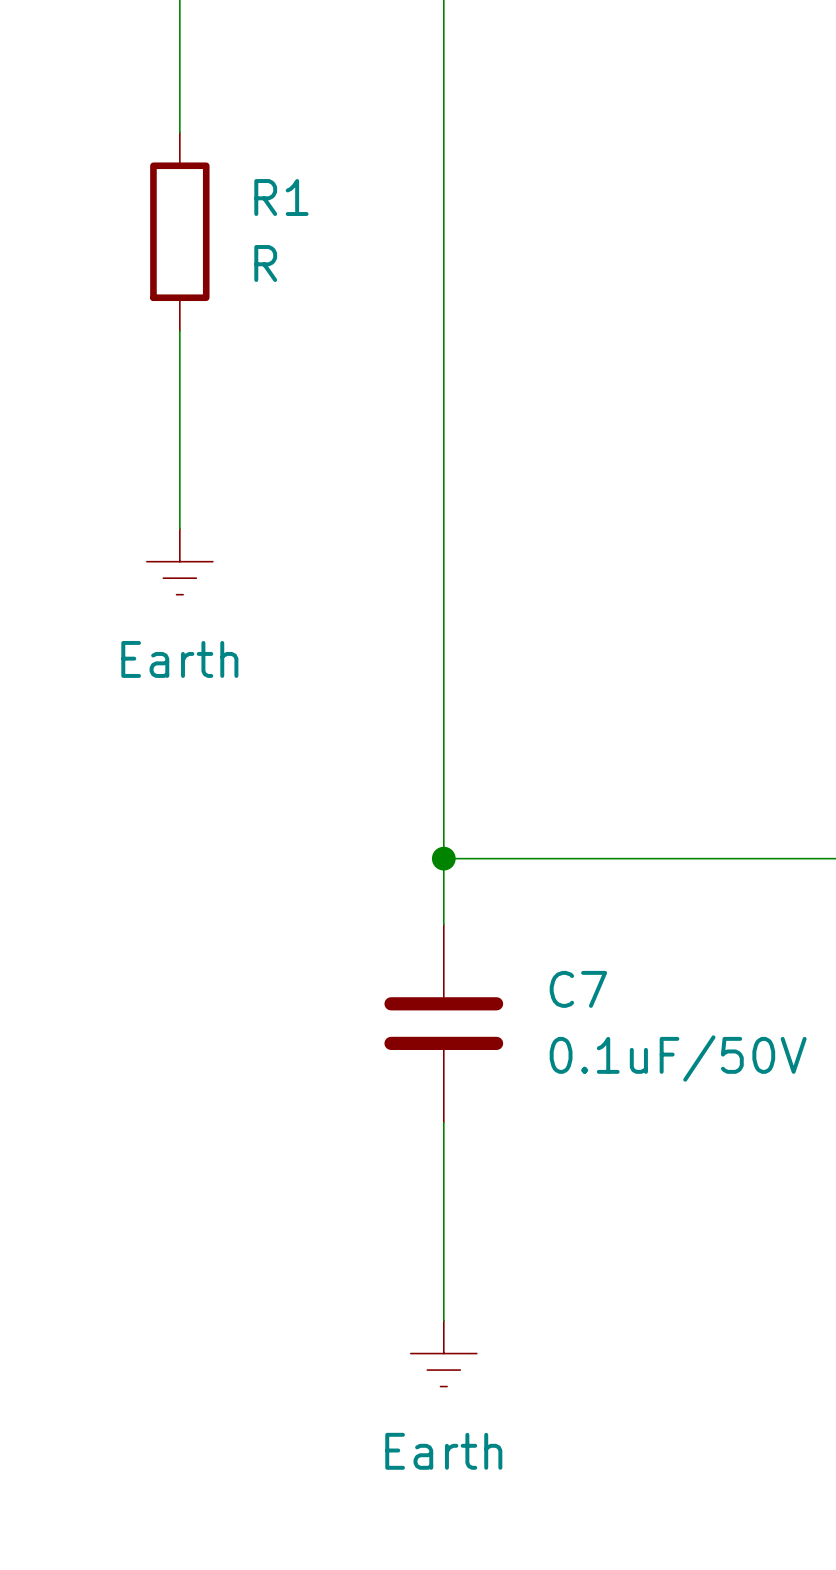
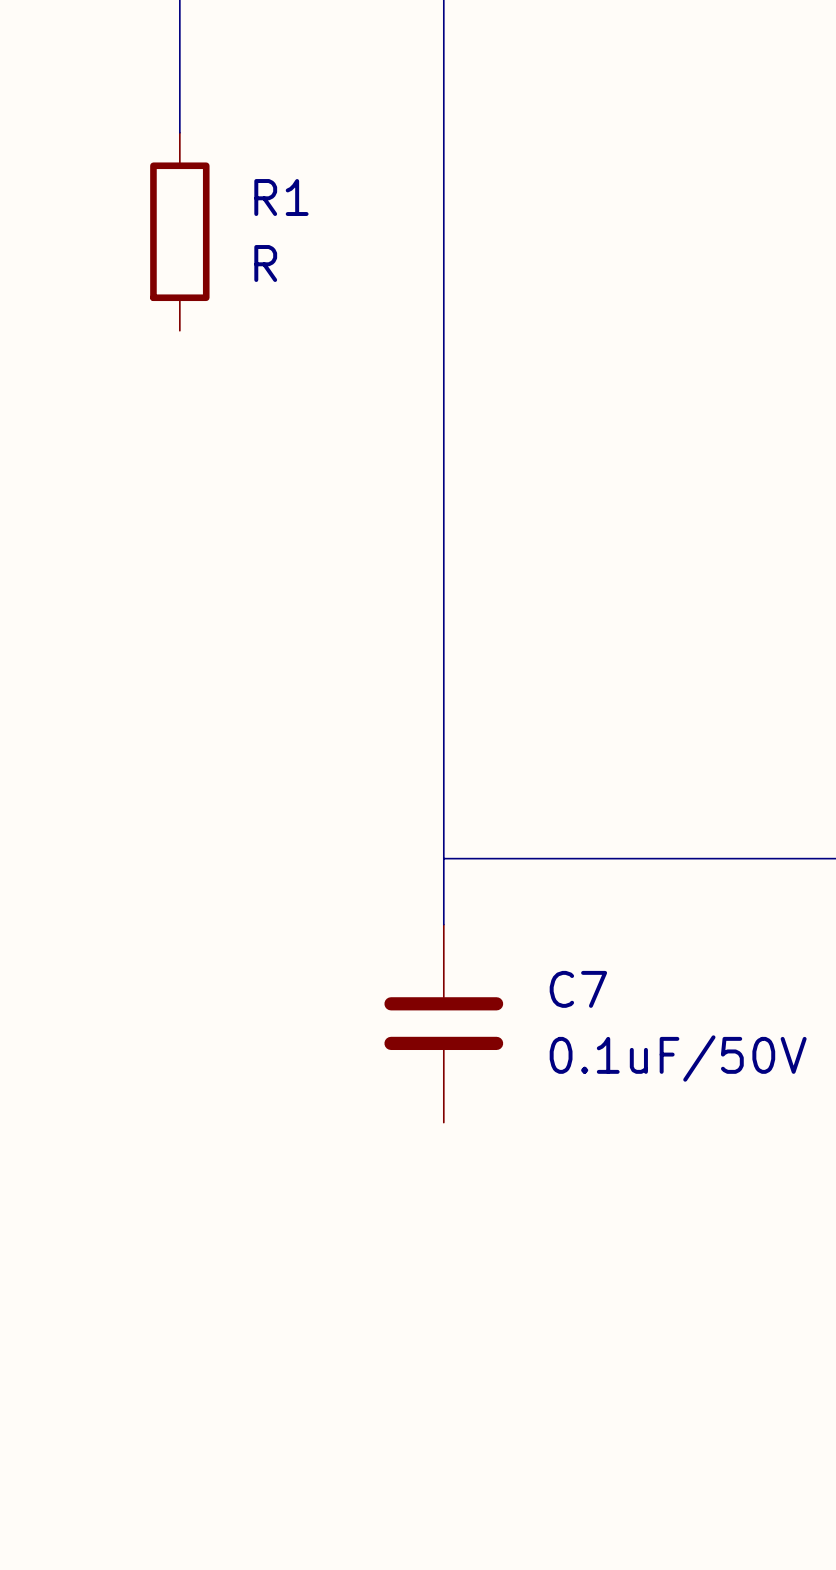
wire: (179, 330) (179, 528) -> none
power symbol: Earth (179, 561) -> none
junction: (443, 858) -> none
wire: (443, 1122) (443, 1320) -> none
power symbol: Earth (443, 1353) -> none

